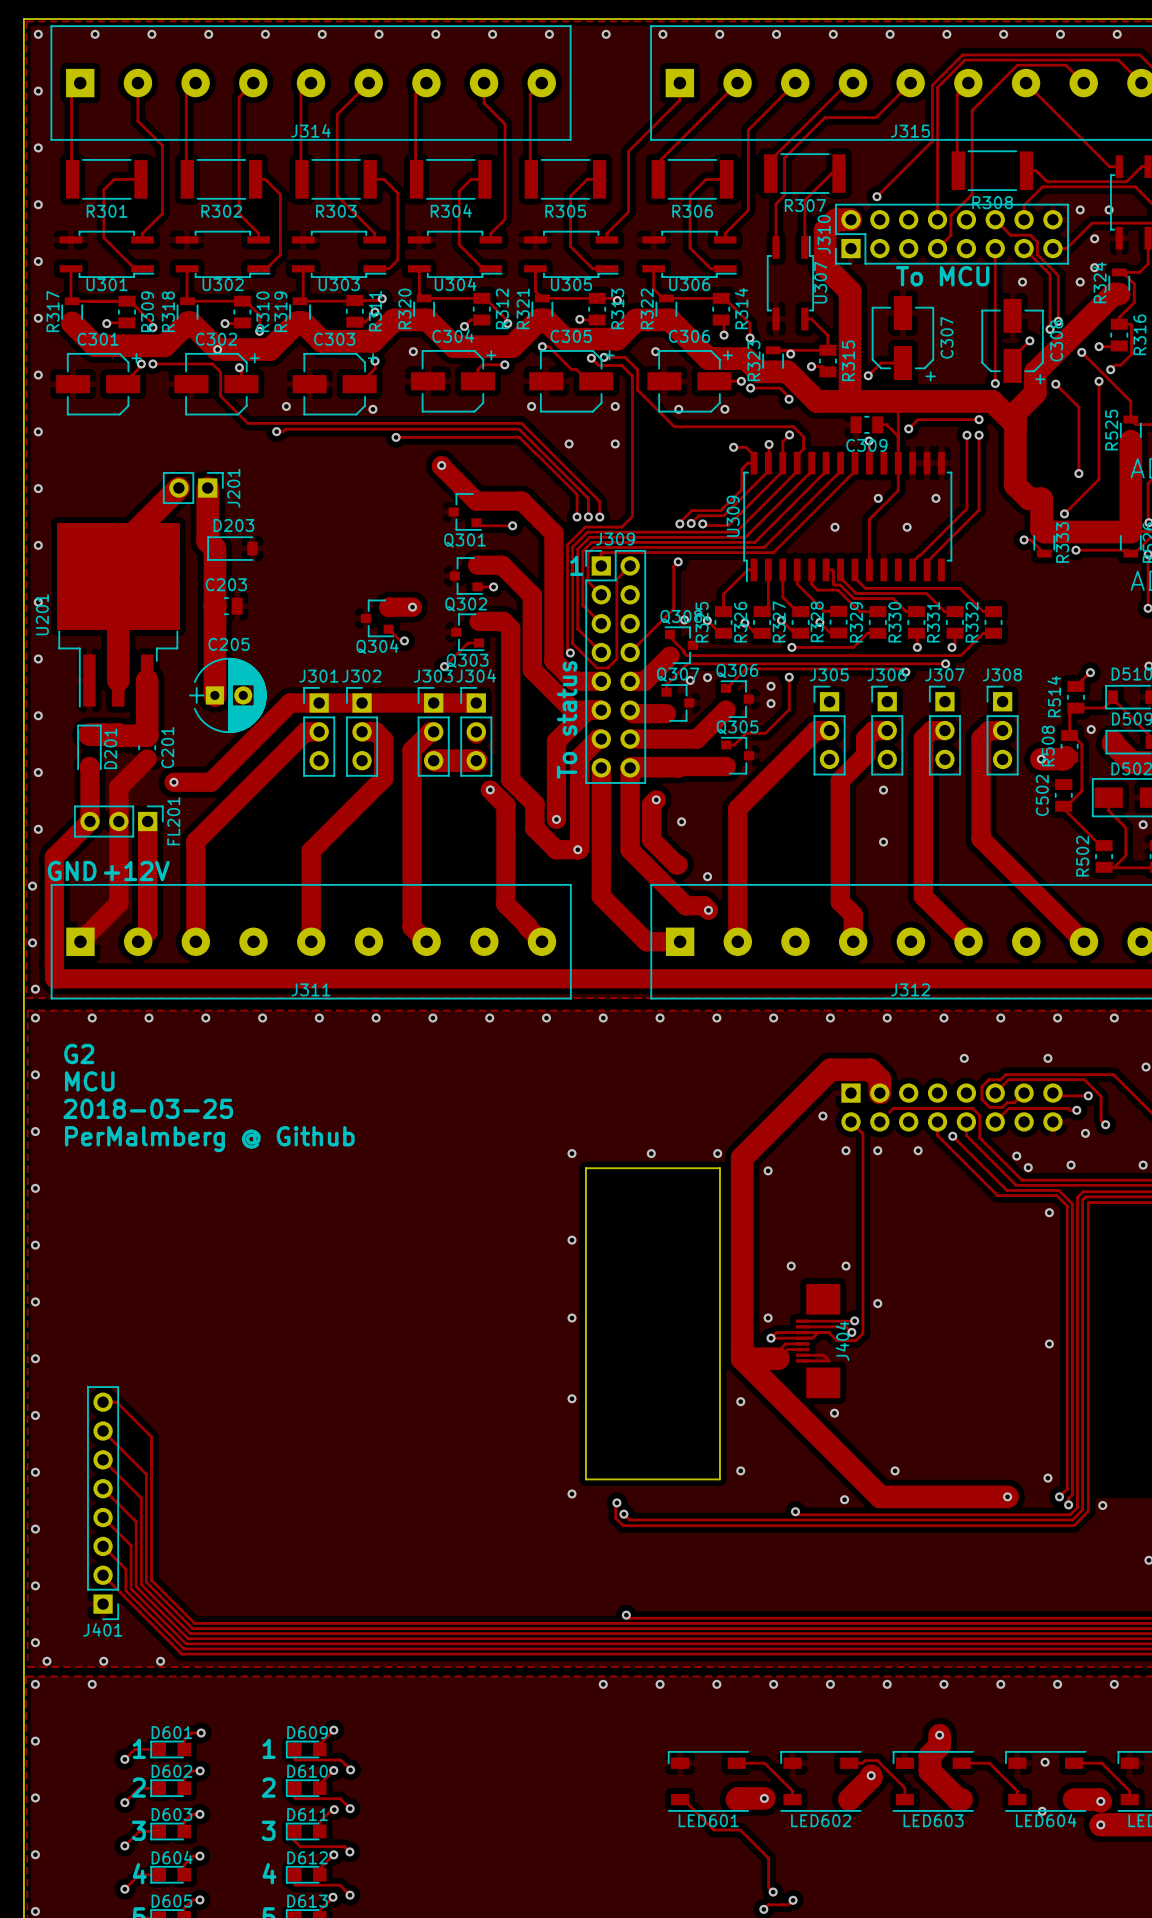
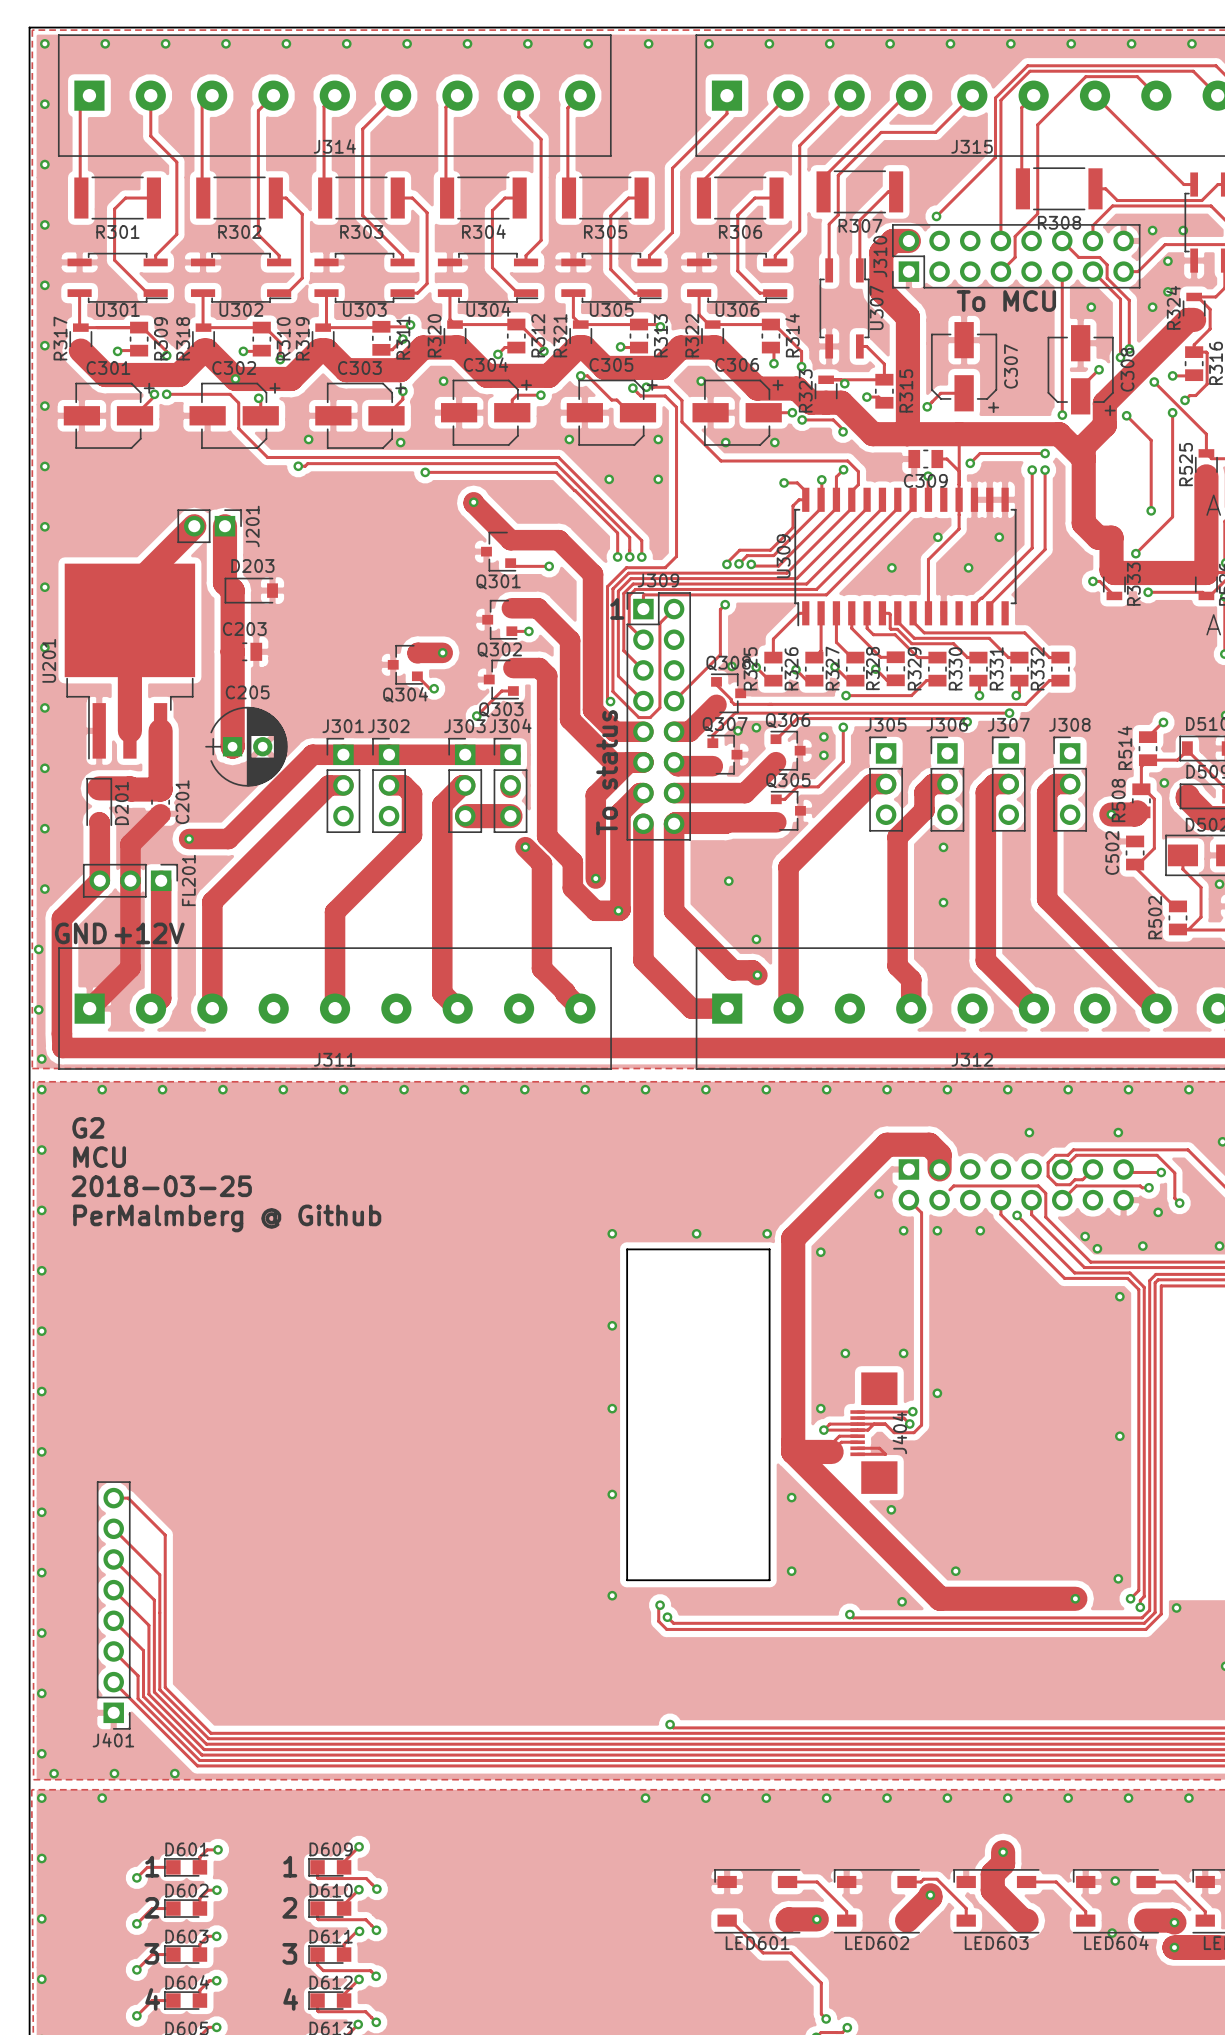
U201 footprint: [56, 523, 180, 708] -> [64, 563, 196, 760]
track: (656, 799) (651, 804) (651, 839) (678, 864) -> none
via: (656, 799) -> none

